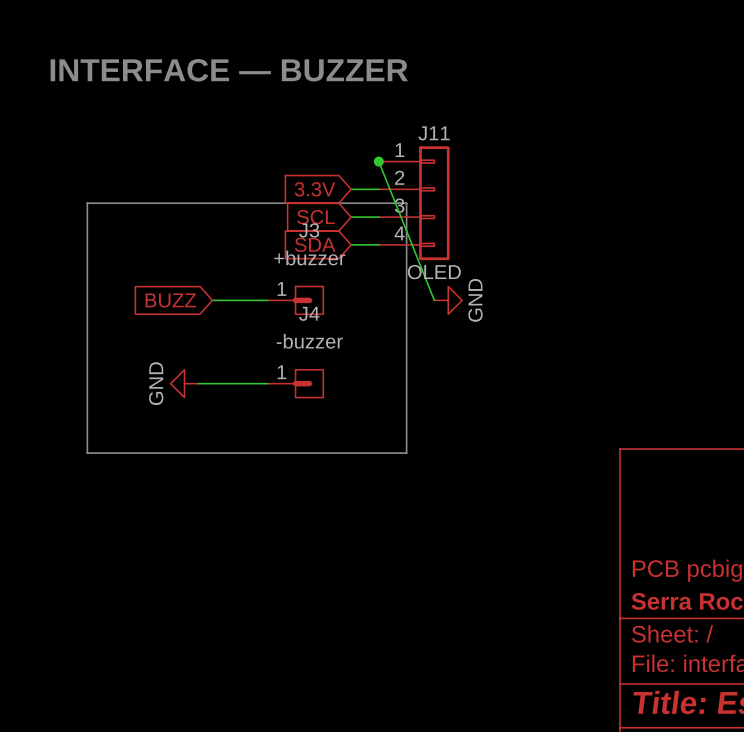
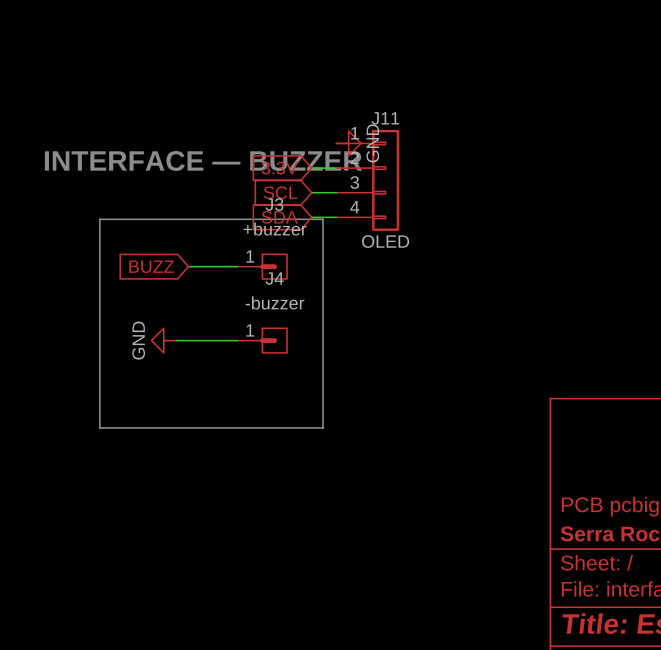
text position: INTERFACE — BUZZER (229, 70) -> INTERFACE — BUZZER (203, 160)
wire: (378, 161) (434, 300) -> none
junction: (378, 161) -> none
line: (87, 203) (406, 203) (406, 453) (87, 453) (87, 203) -> (99, 219) (99, 427) (323, 427) (323, 219) (99, 219)
power symbol position: GND (448, 300) -> GND (348, 143)

